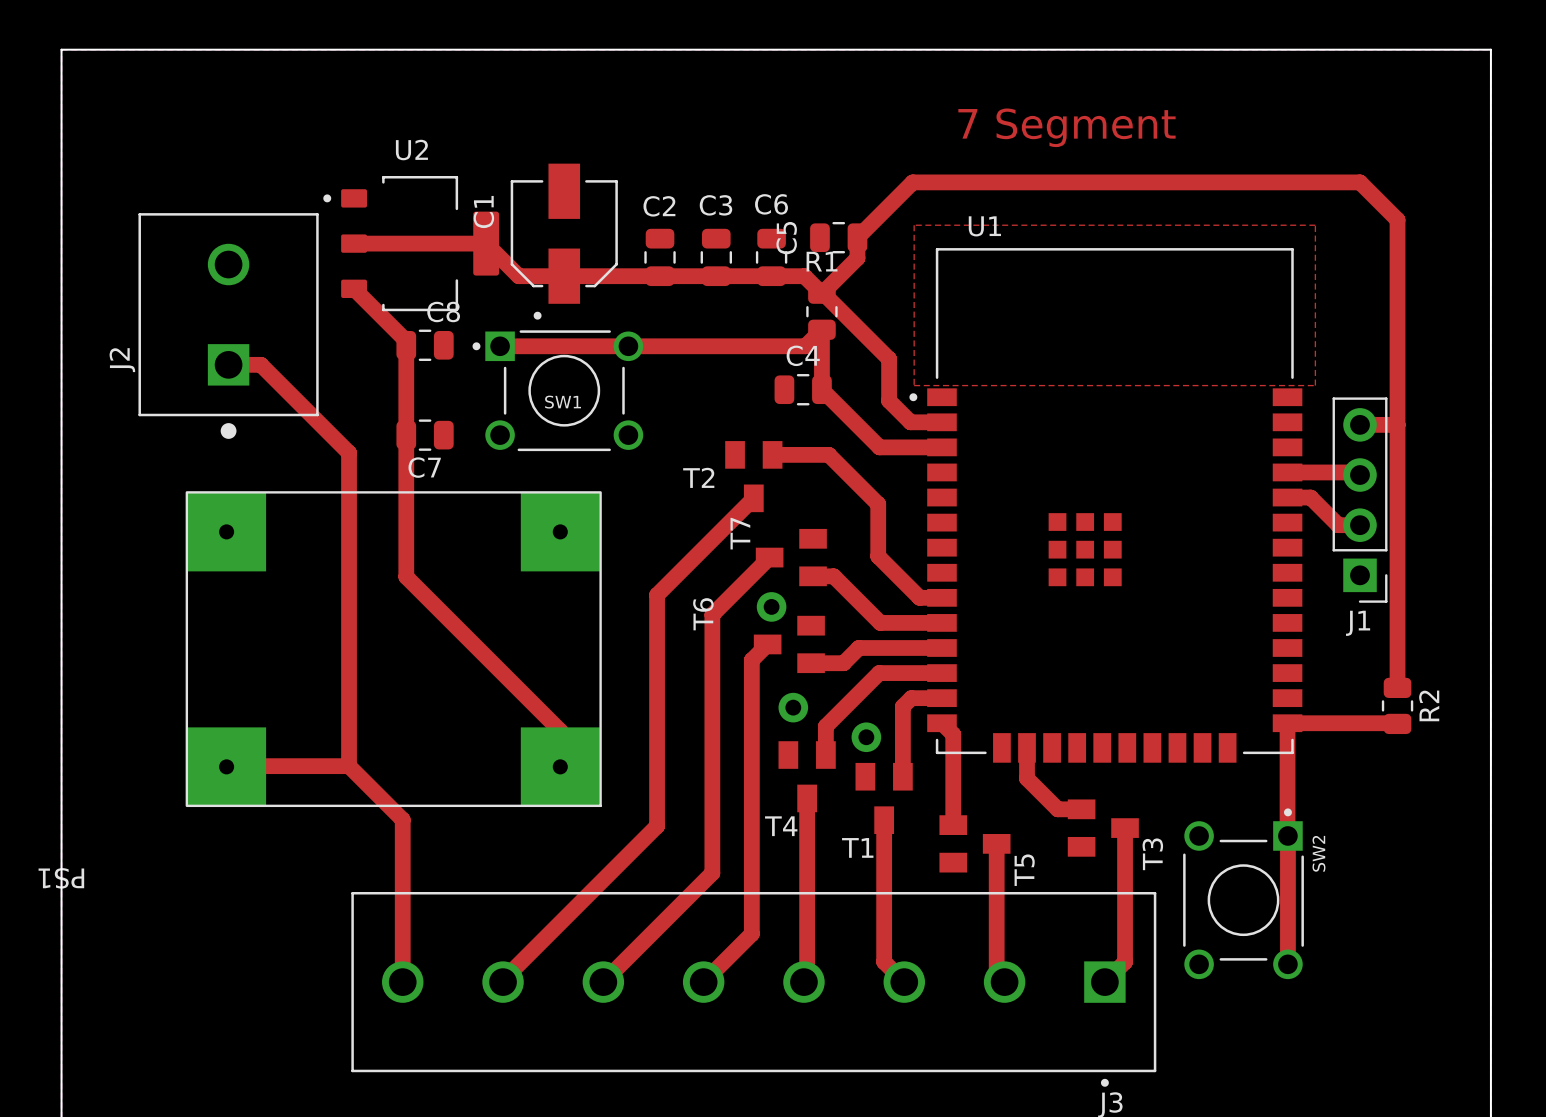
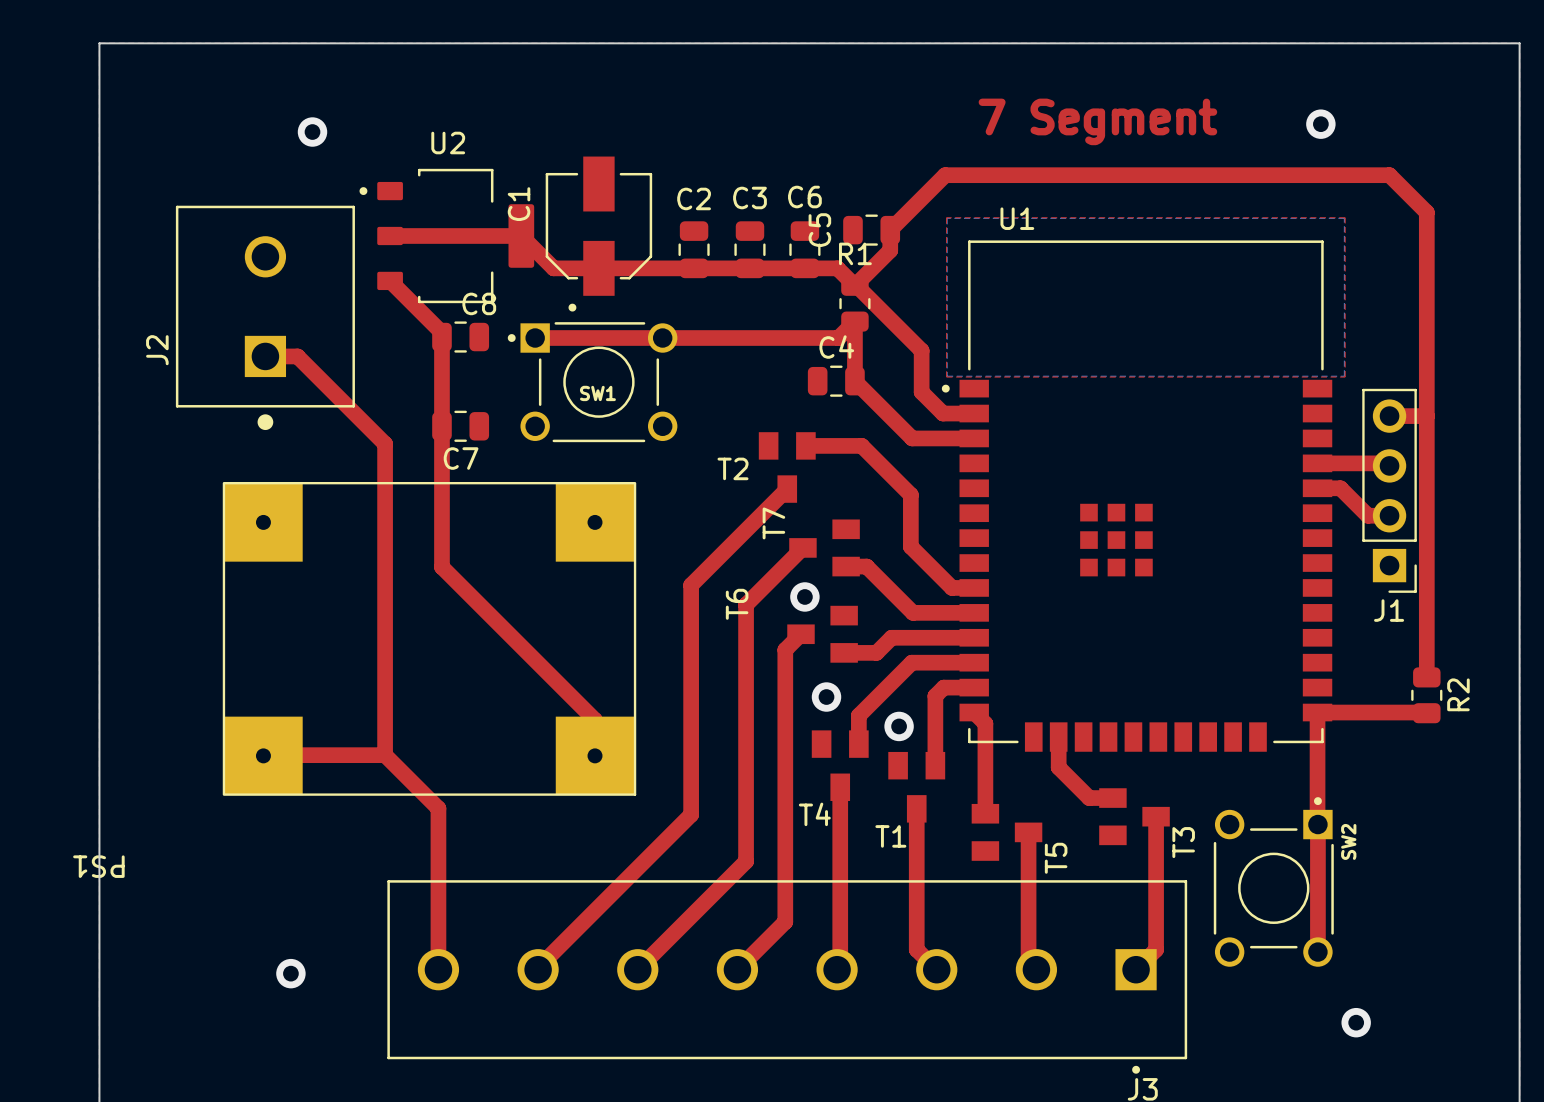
via: none -> (1320, 124)
via: none -> (312, 132)
bottom zone outline: none -> (947, 218) (947, 376) (1344, 376) (1344, 218) (947, 218)
via: none -> (290, 973)
via: none -> (1356, 1022)

